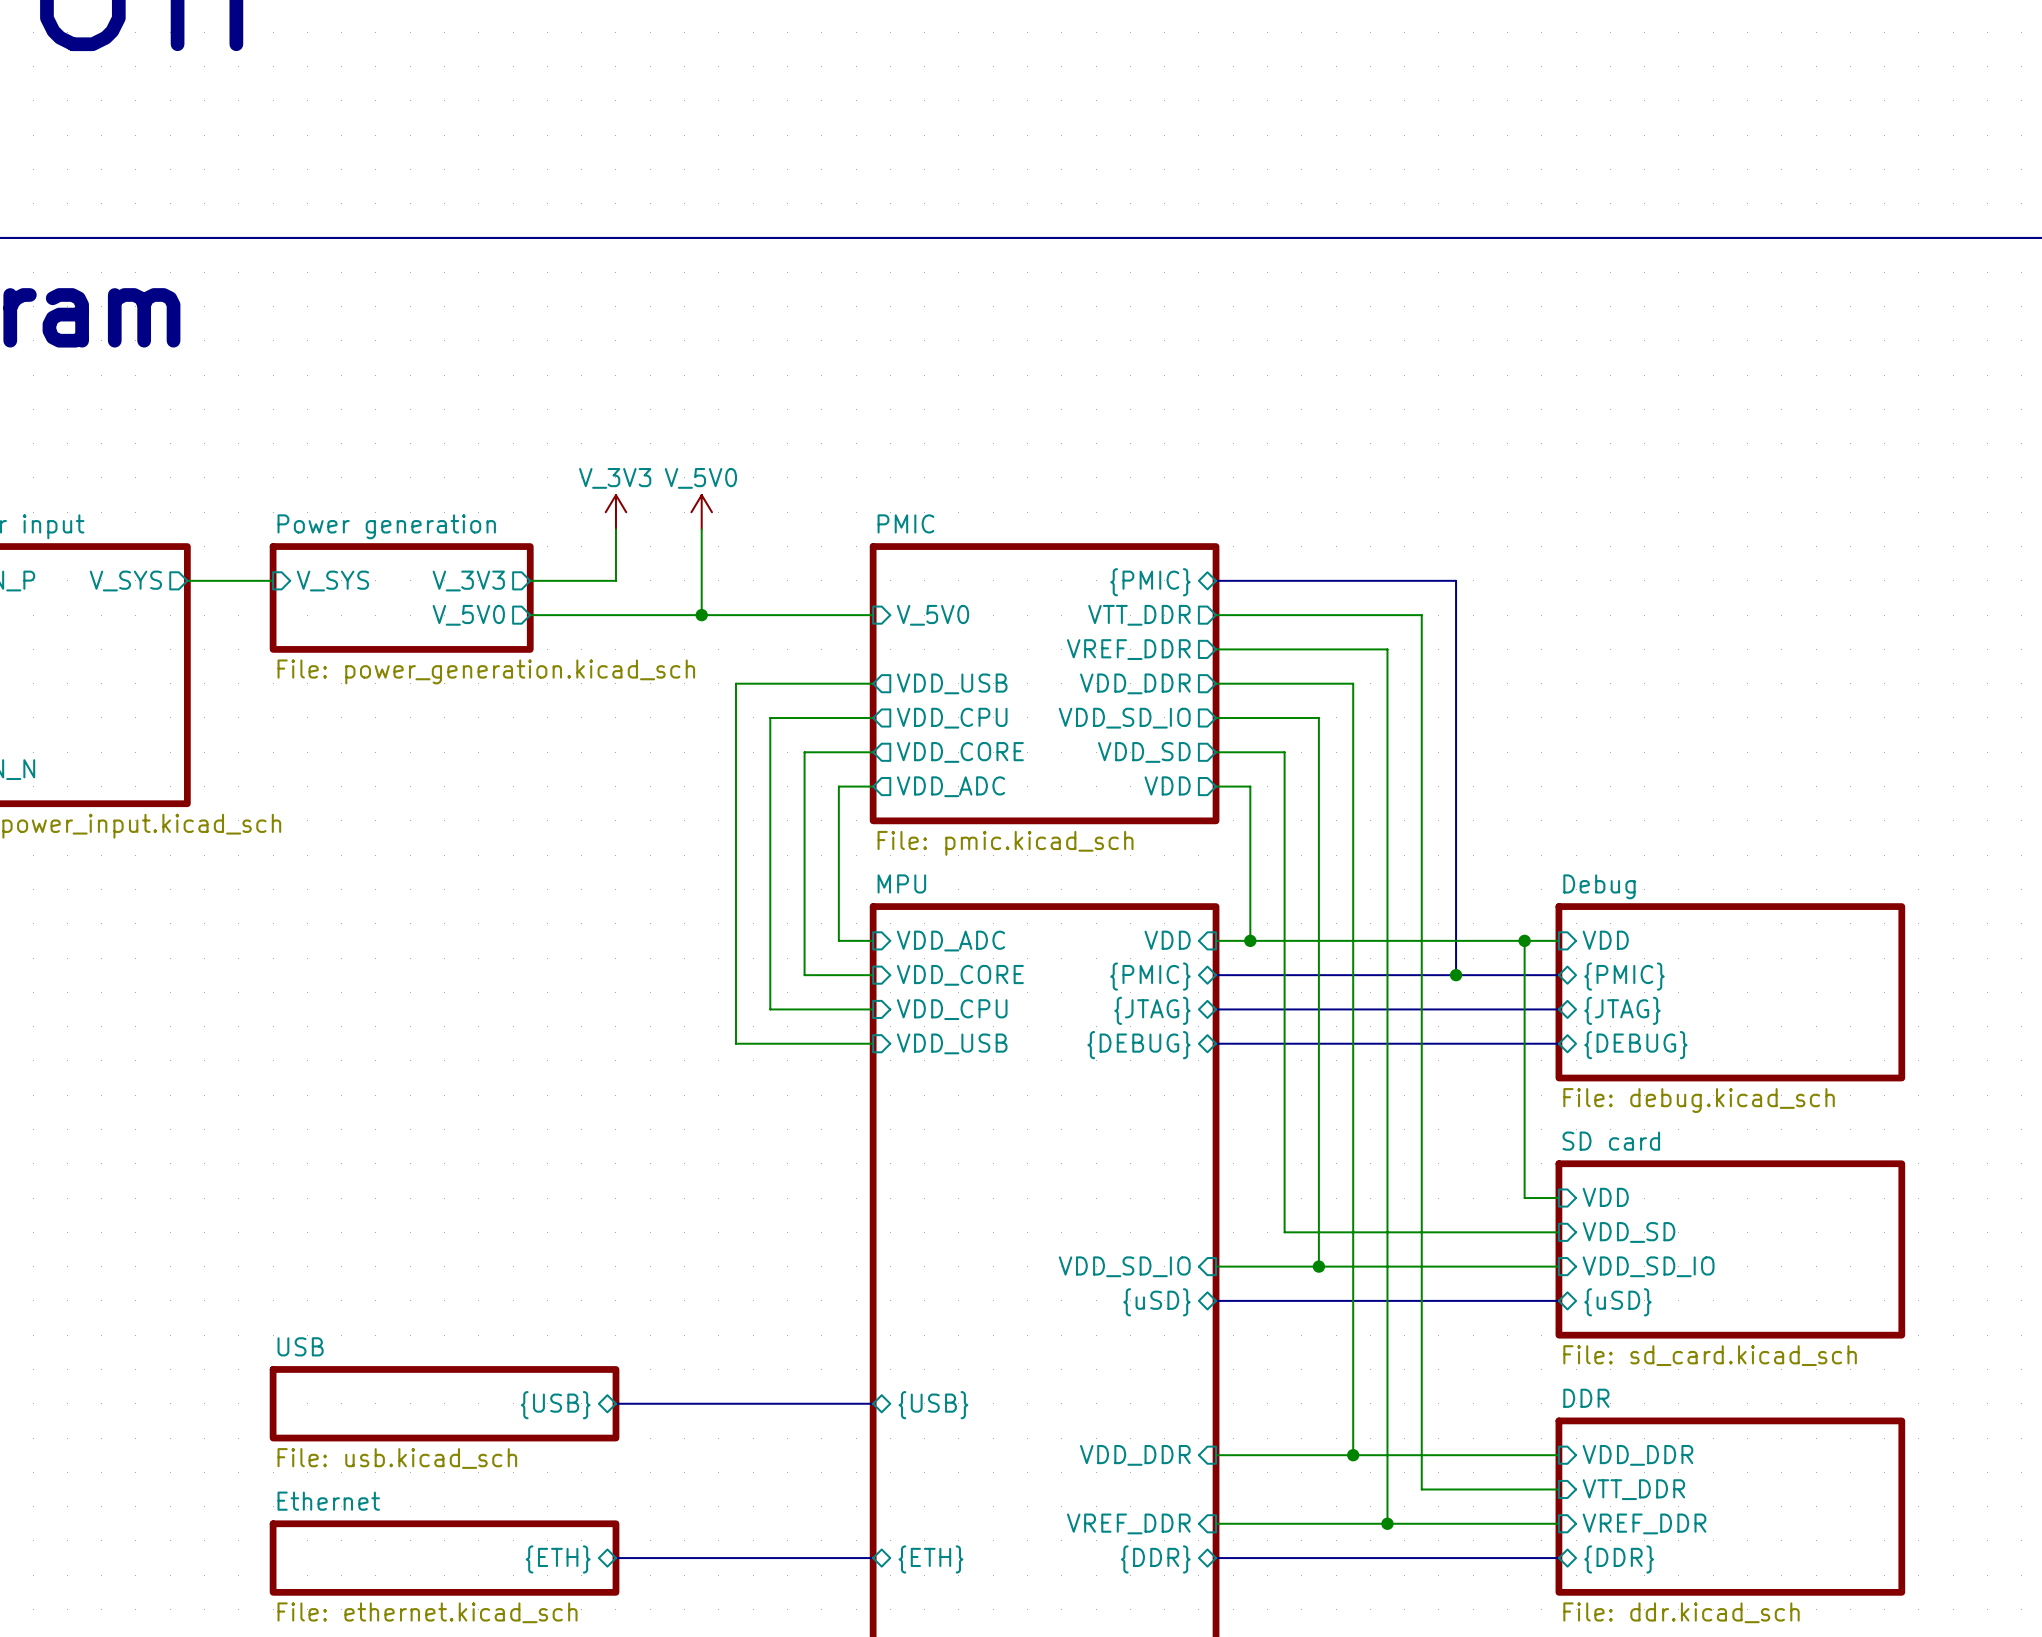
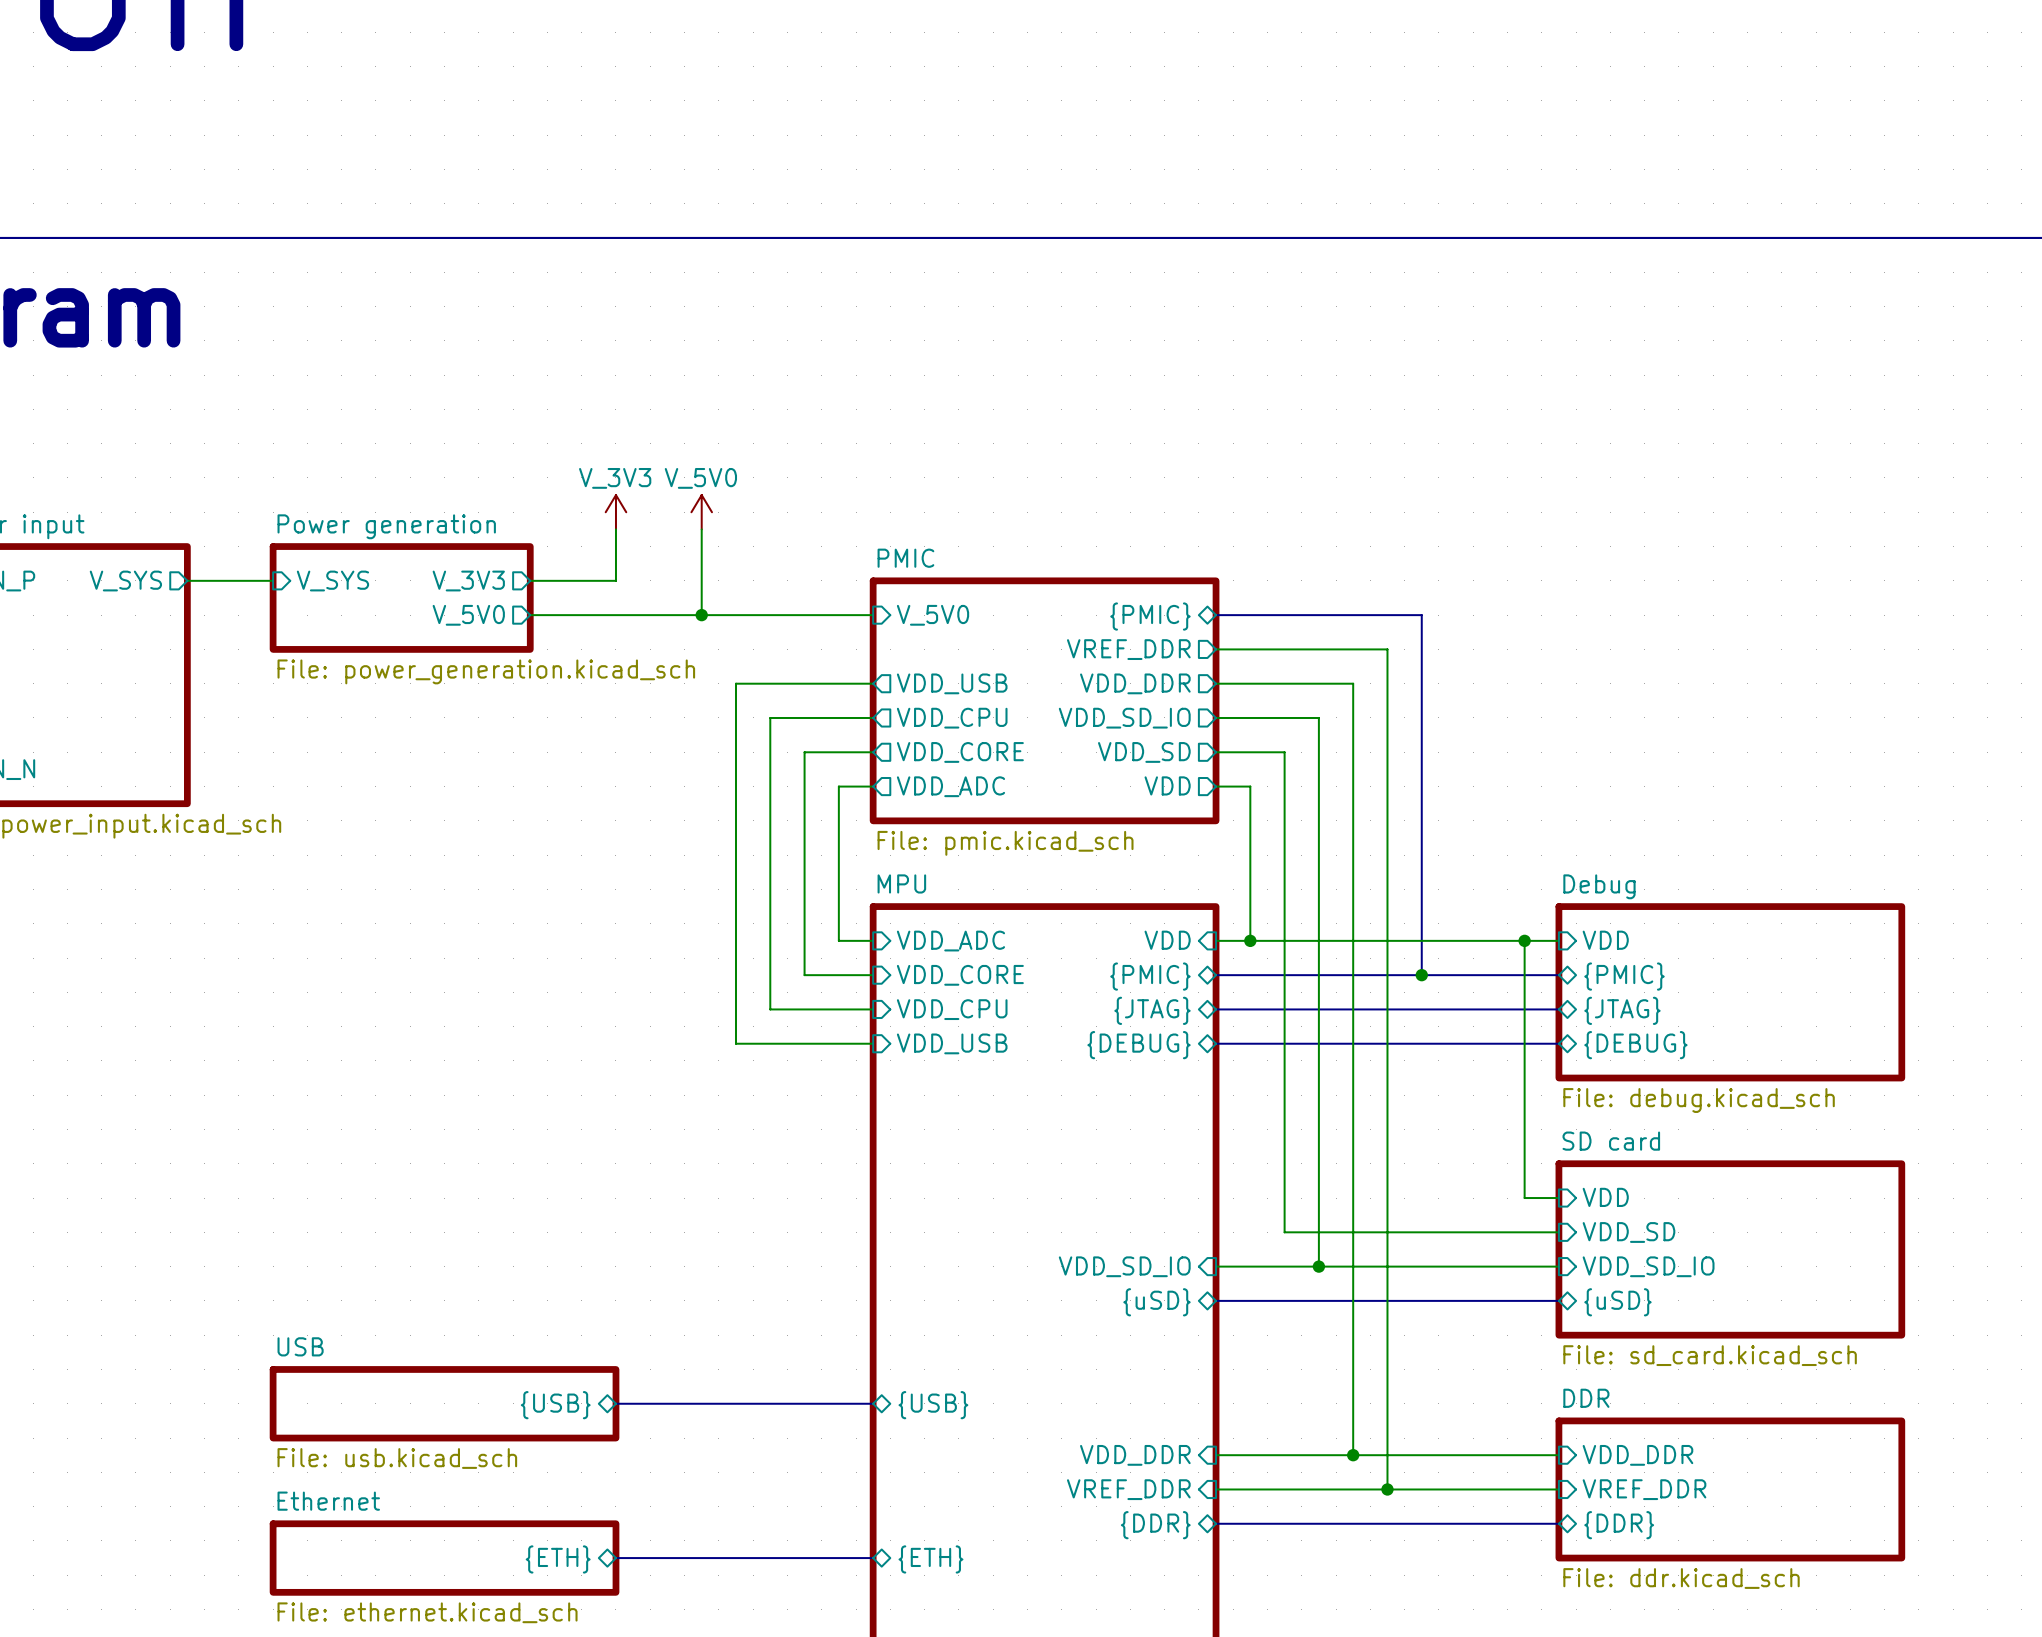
bus: (1216, 580) (1456, 580) (1456, 975) -> none
sheet pin: {PMIC} (1150, 582) -> none
sheet pin shape: output (1139, 615) -> bidirectional (1150, 616)
sheet pin: VTT_DDR (1139, 615) -> {PMIC} (1150, 616)
bus: none -> (1216, 615) (1421, 615) (1421, 975)
wire: (1216, 615) (1421, 615) (1421, 1489) -> (1216, 1489) (1421, 1489)
sheet PMIC: File: pmic.kicad_sch (1044, 683) -> none
sheet PMIC: none -> File: pmic.kicad_sch (1044, 700)
junction position: (1456, 975) -> (1421, 975)
sheet pin: none -> VREF_DDR (1128, 1489)
wire: (1387, 1489) (1387, 1523) -> none
sheet pin: VTT_DDR (1633, 1489) -> VREF_DDR (1644, 1489)
sheet DDR: none -> File: ddr.kicad_sch (1730, 1489)
sheet DDR: File: ddr.kicad_sch (1730, 1506) -> none
sheet pin shape: input (1128, 1523) -> bidirectional (1155, 1525)
sheet pin: VREF_DDR (1128, 1523) -> {DDR} (1155, 1525)
junction position: (1387, 1523) -> (1387, 1489)
sheet pin shape: input (1644, 1523) -> bidirectional (1619, 1525)
sheet pin: VREF_DDR (1644, 1523) -> {DDR} (1619, 1525)
bus: (1216, 1558) (1558, 1558) -> (1216, 1523) (1558, 1523)
sheet pin: {DDR} (1155, 1559) -> none
sheet pin: {DDR} (1619, 1559) -> none

